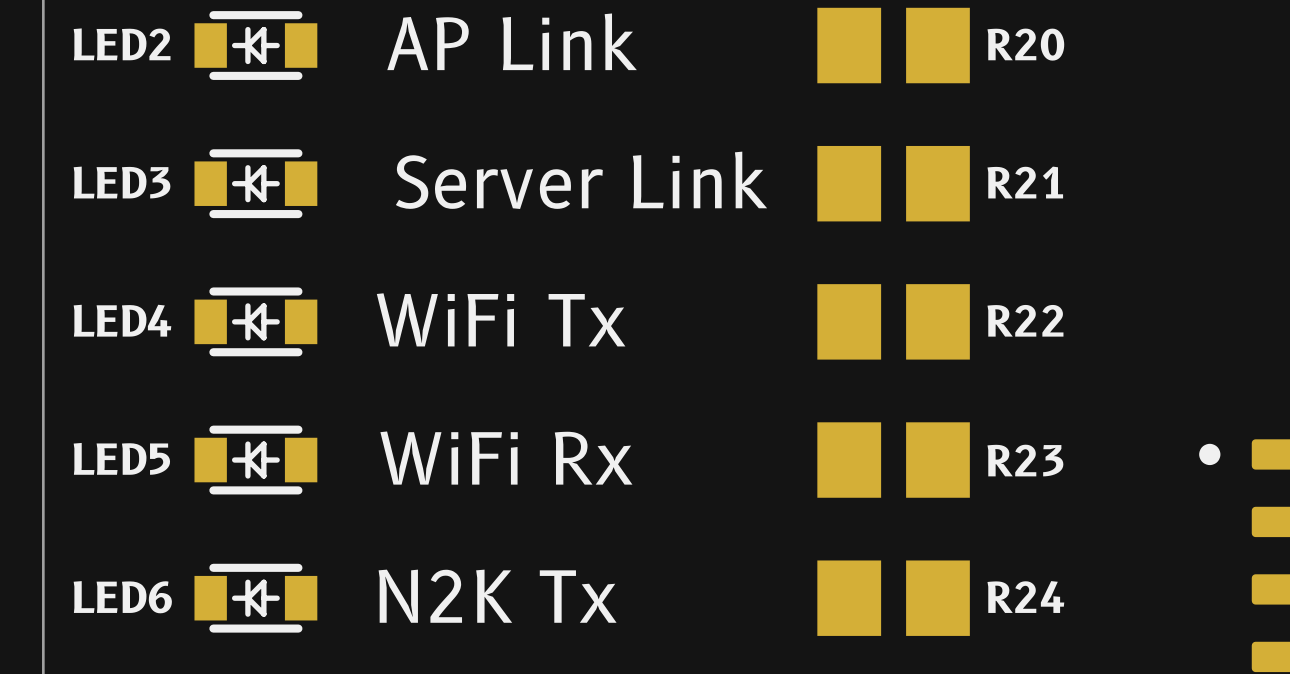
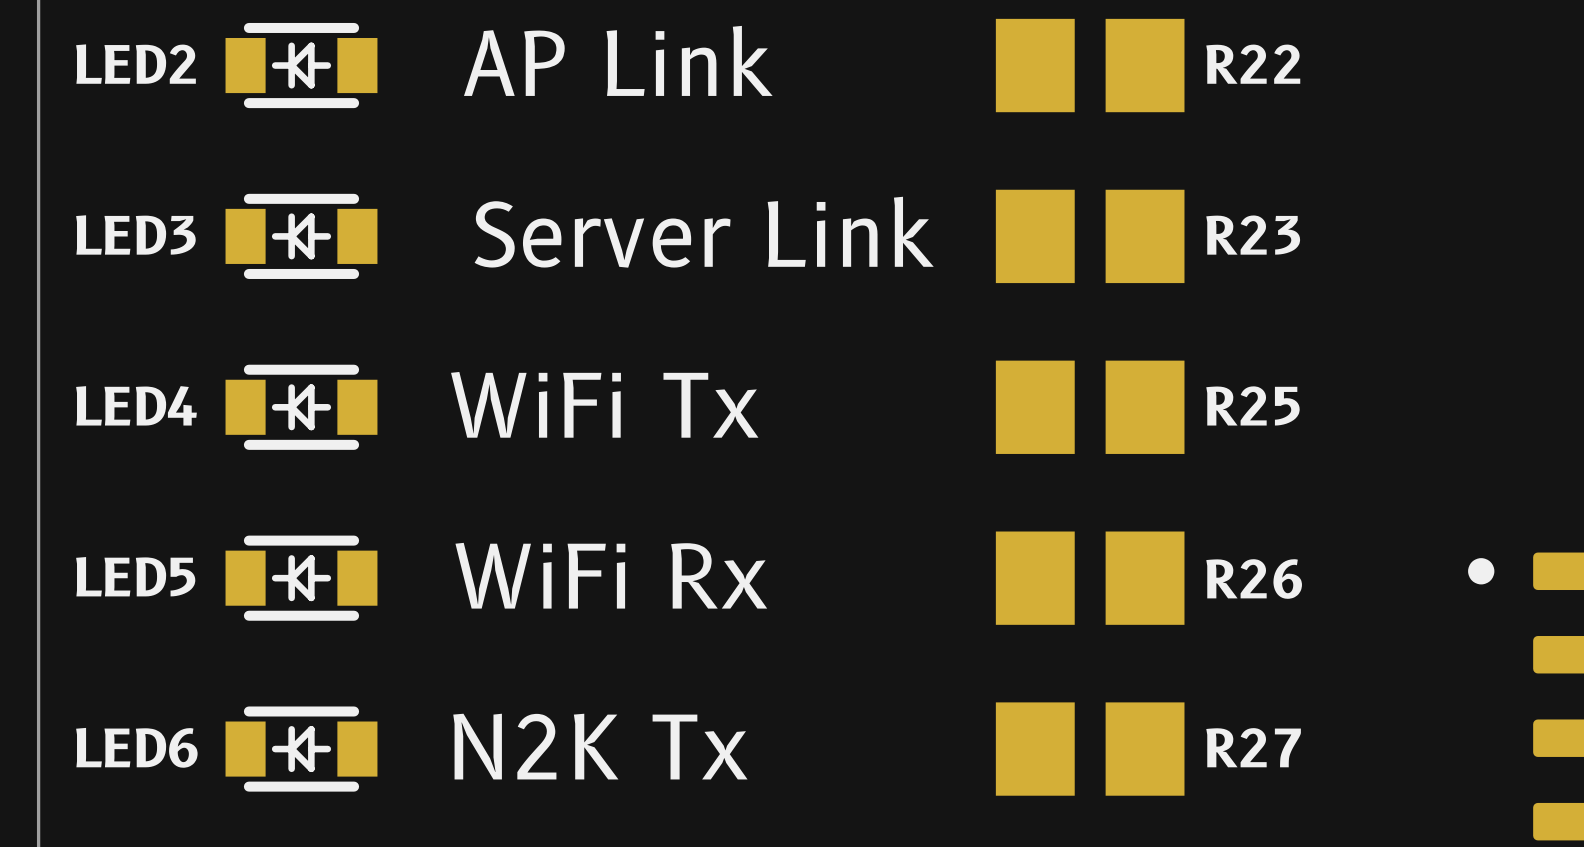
R20 name: R20 (1025, 44) -> R22 (1253, 64)
R21 name: R21 (1025, 182) -> R23 (1253, 235)
R22 name: R22 (1025, 320) -> R25 (1252, 405)
R23 name: R23 (1025, 460) -> R26 (1254, 579)
R24 name: R24 (1025, 597) -> R27 (1253, 747)

